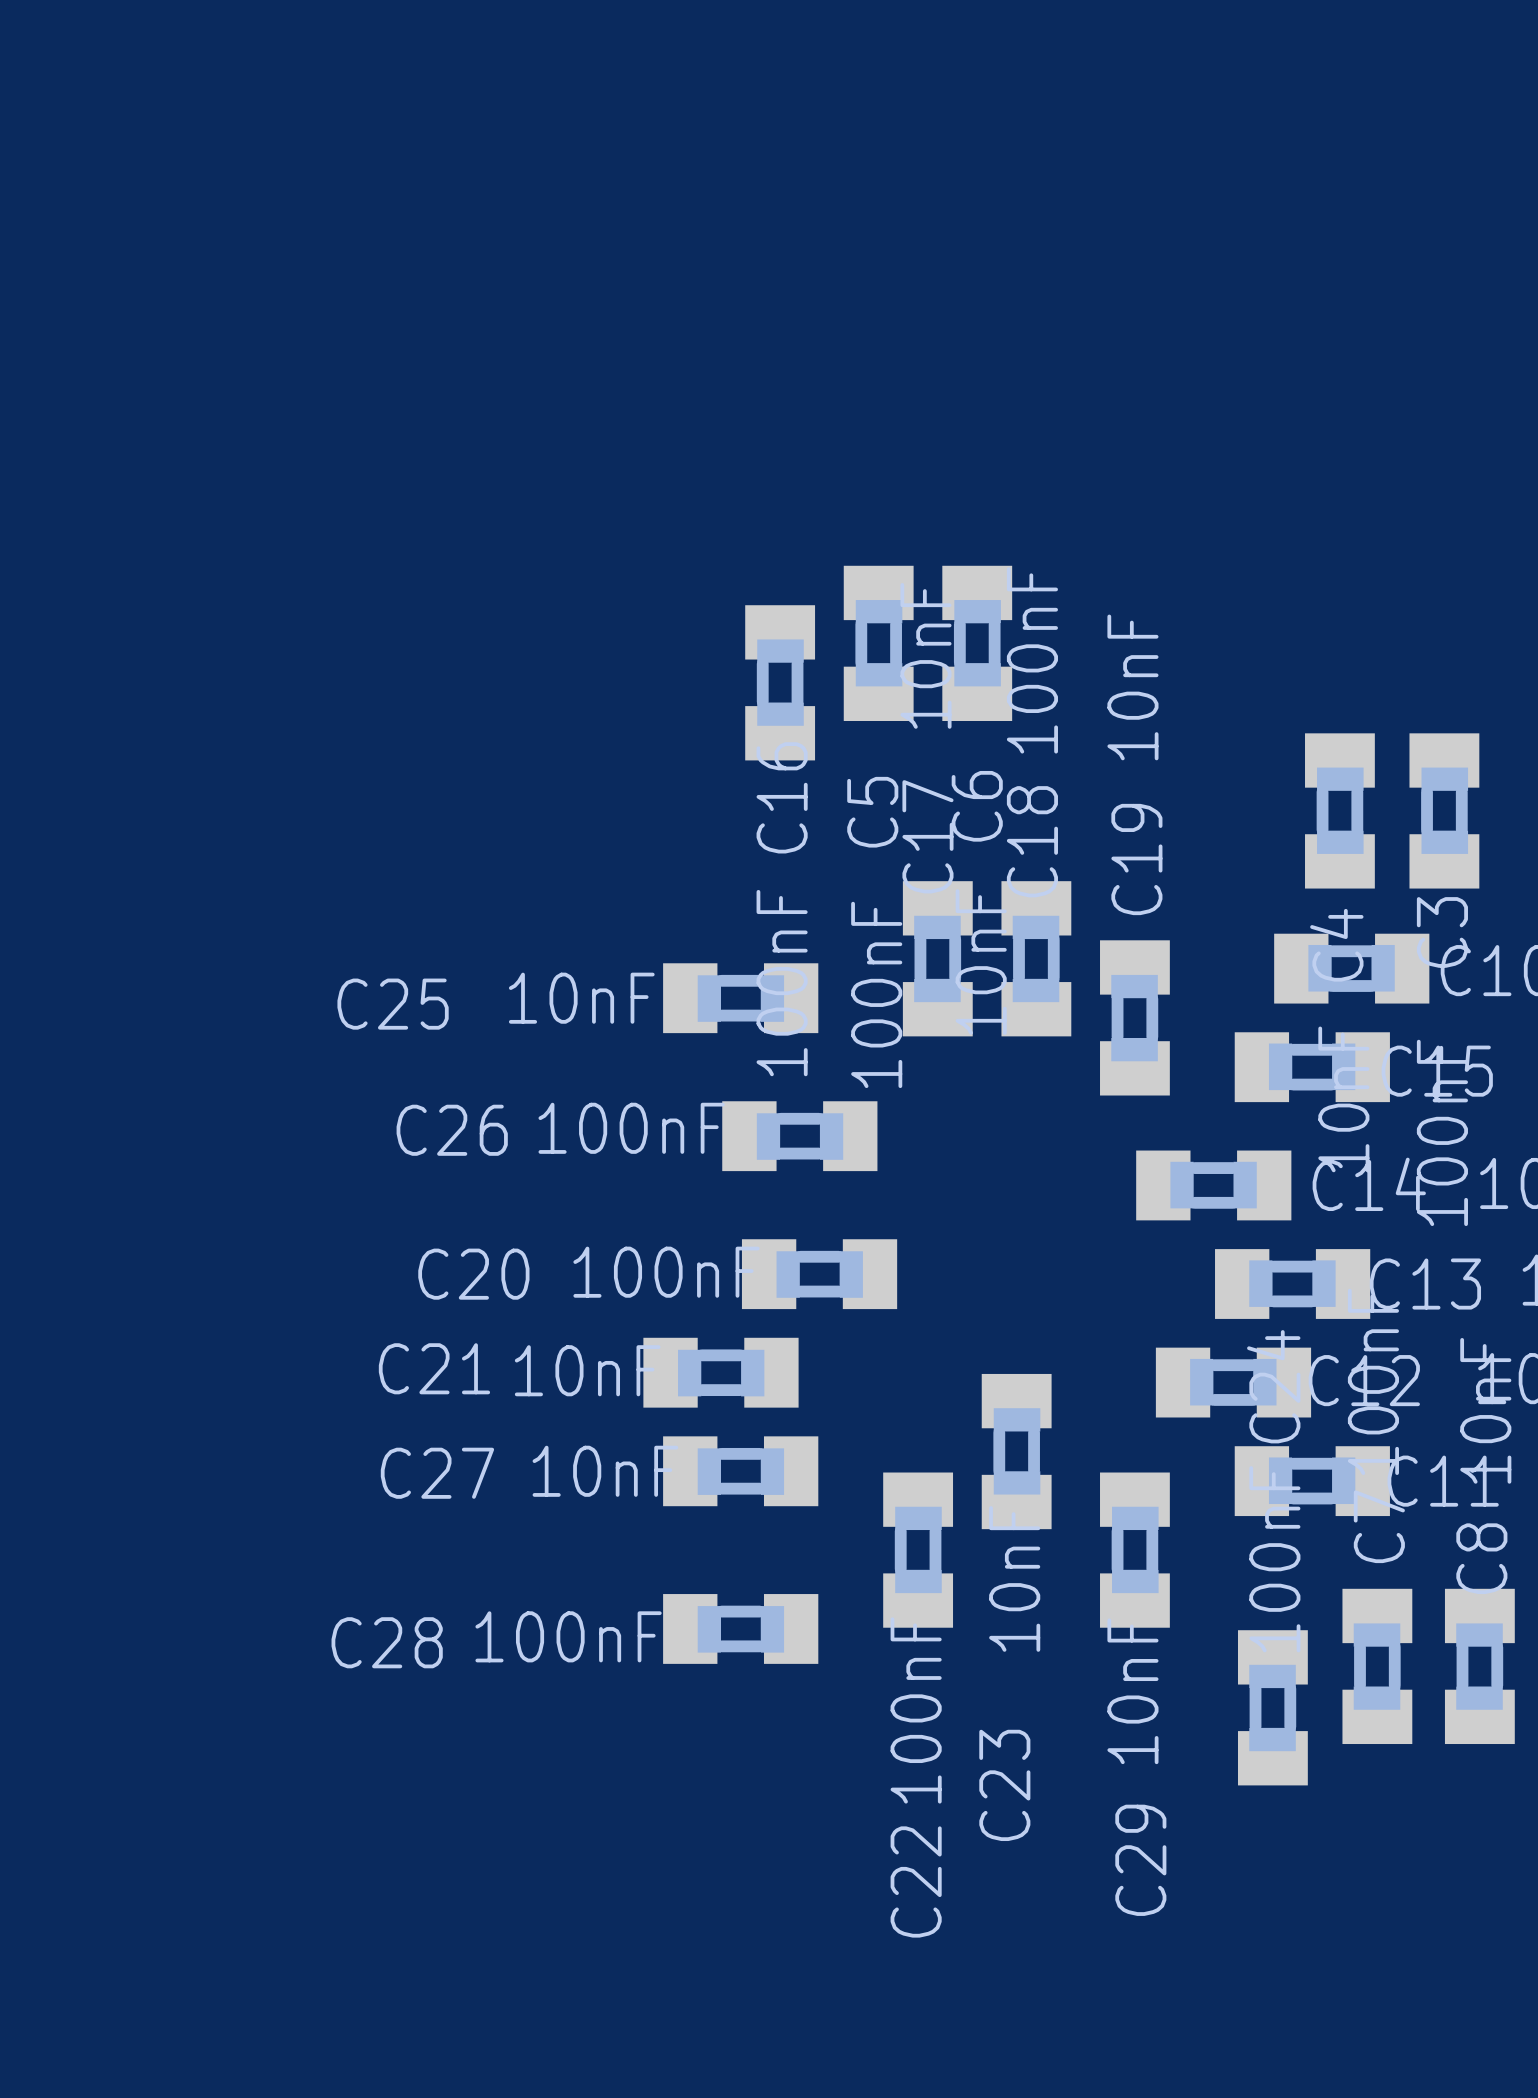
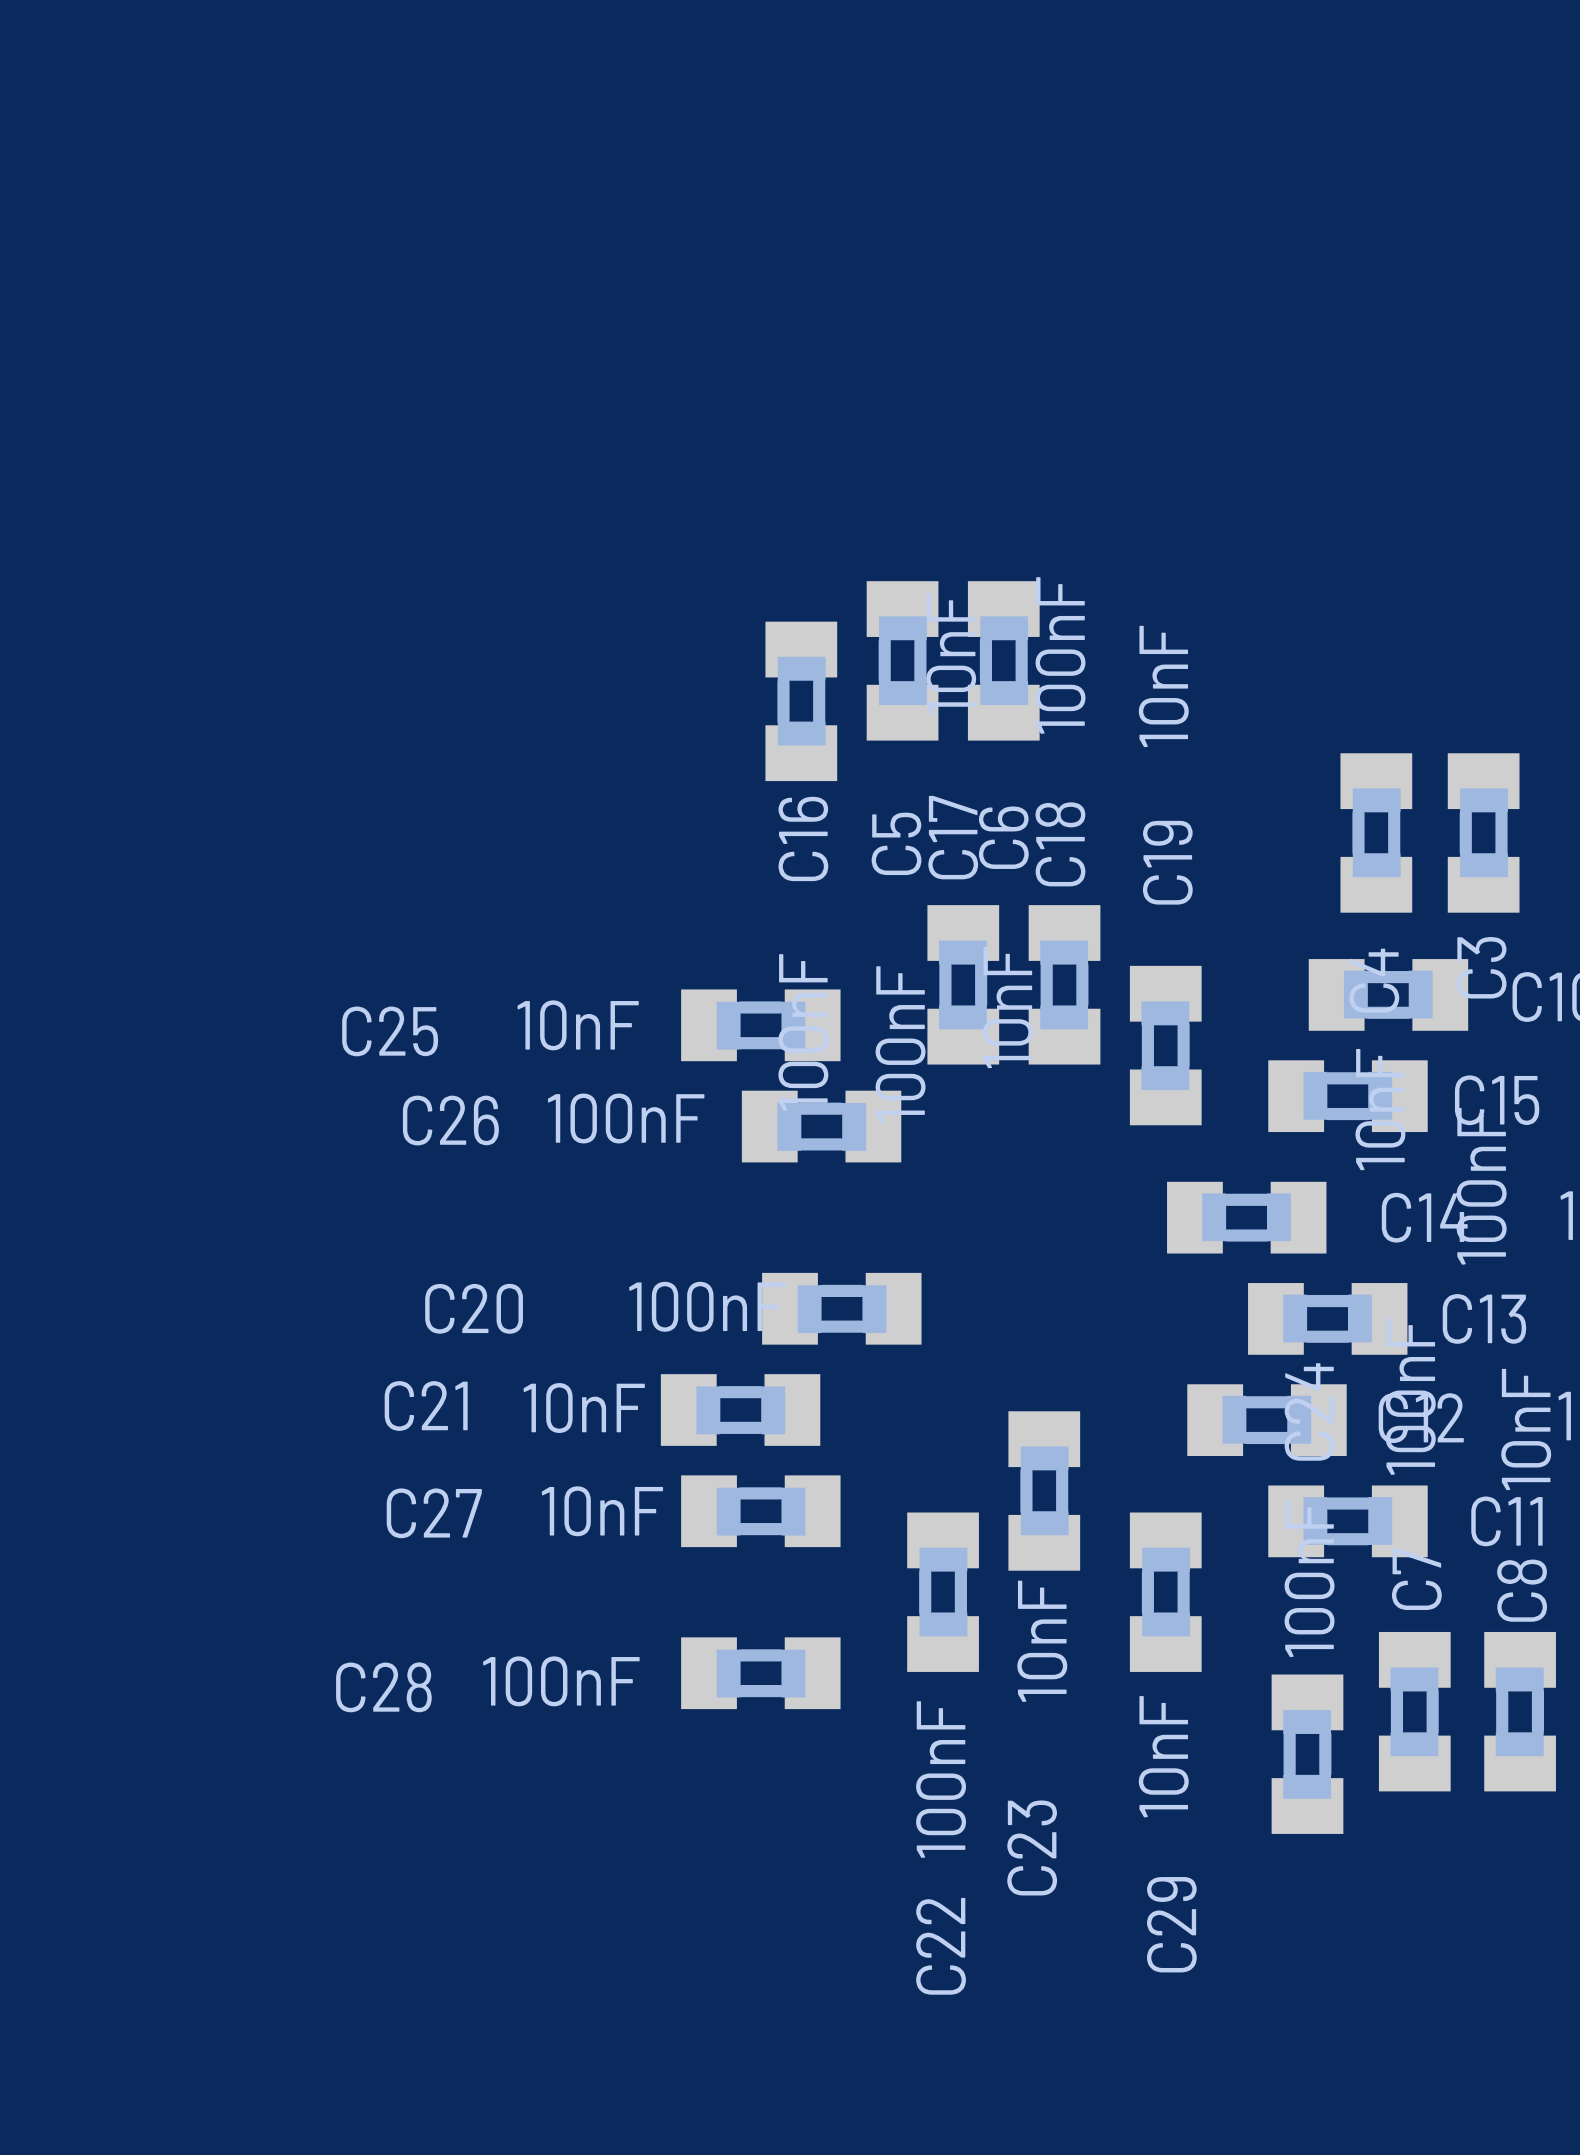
C26 position: (799, 1136) -> (821, 1126)

